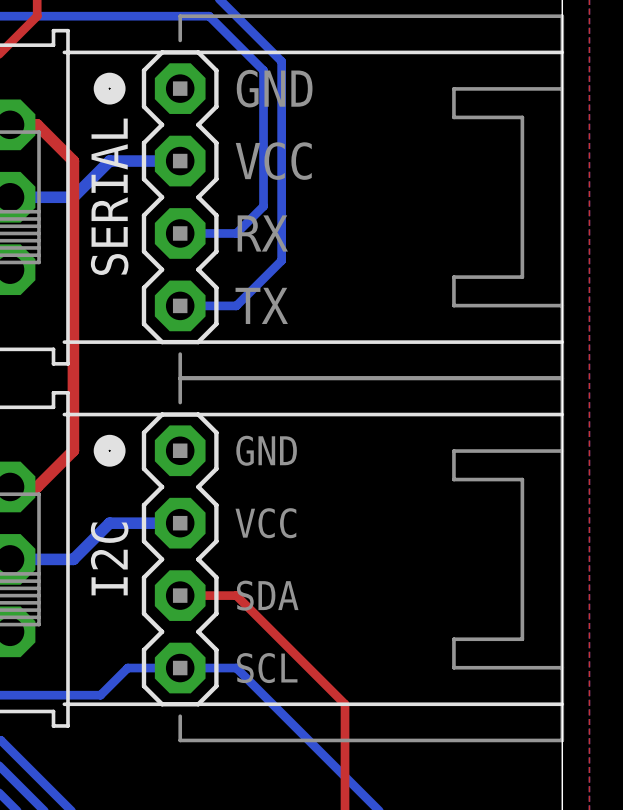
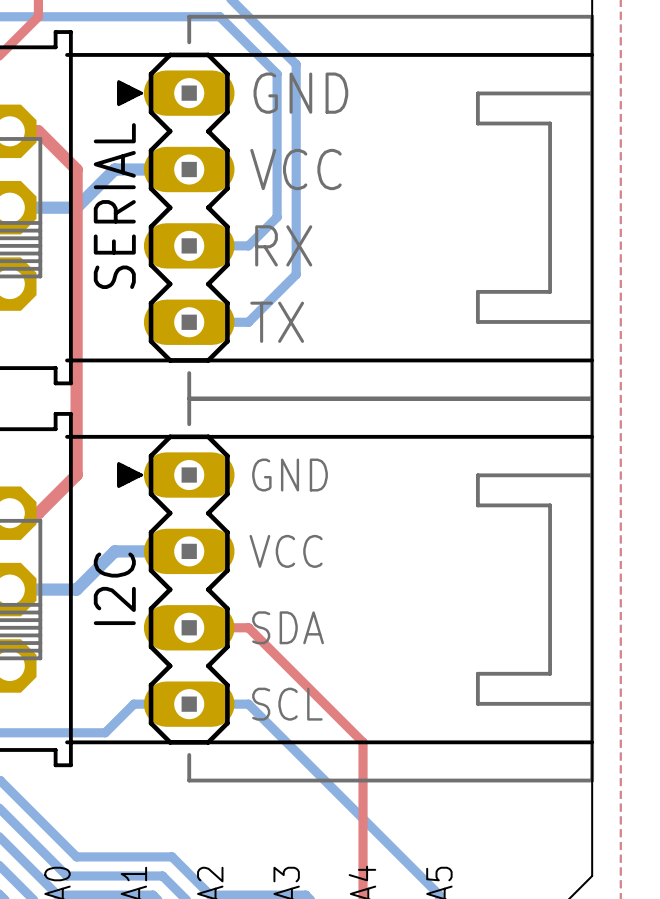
part footprint: [141, 14, 565, 381] -> [143, 14, 595, 401]
drawing: [93, 72, 126, 105] -> none
text: none -> ▲ (130, 93)
part footprint: [141, 376, 565, 743] -> [143, 396, 595, 783]
drawing: [93, 434, 126, 467] -> none
text: none -> ▲ (130, 475)

